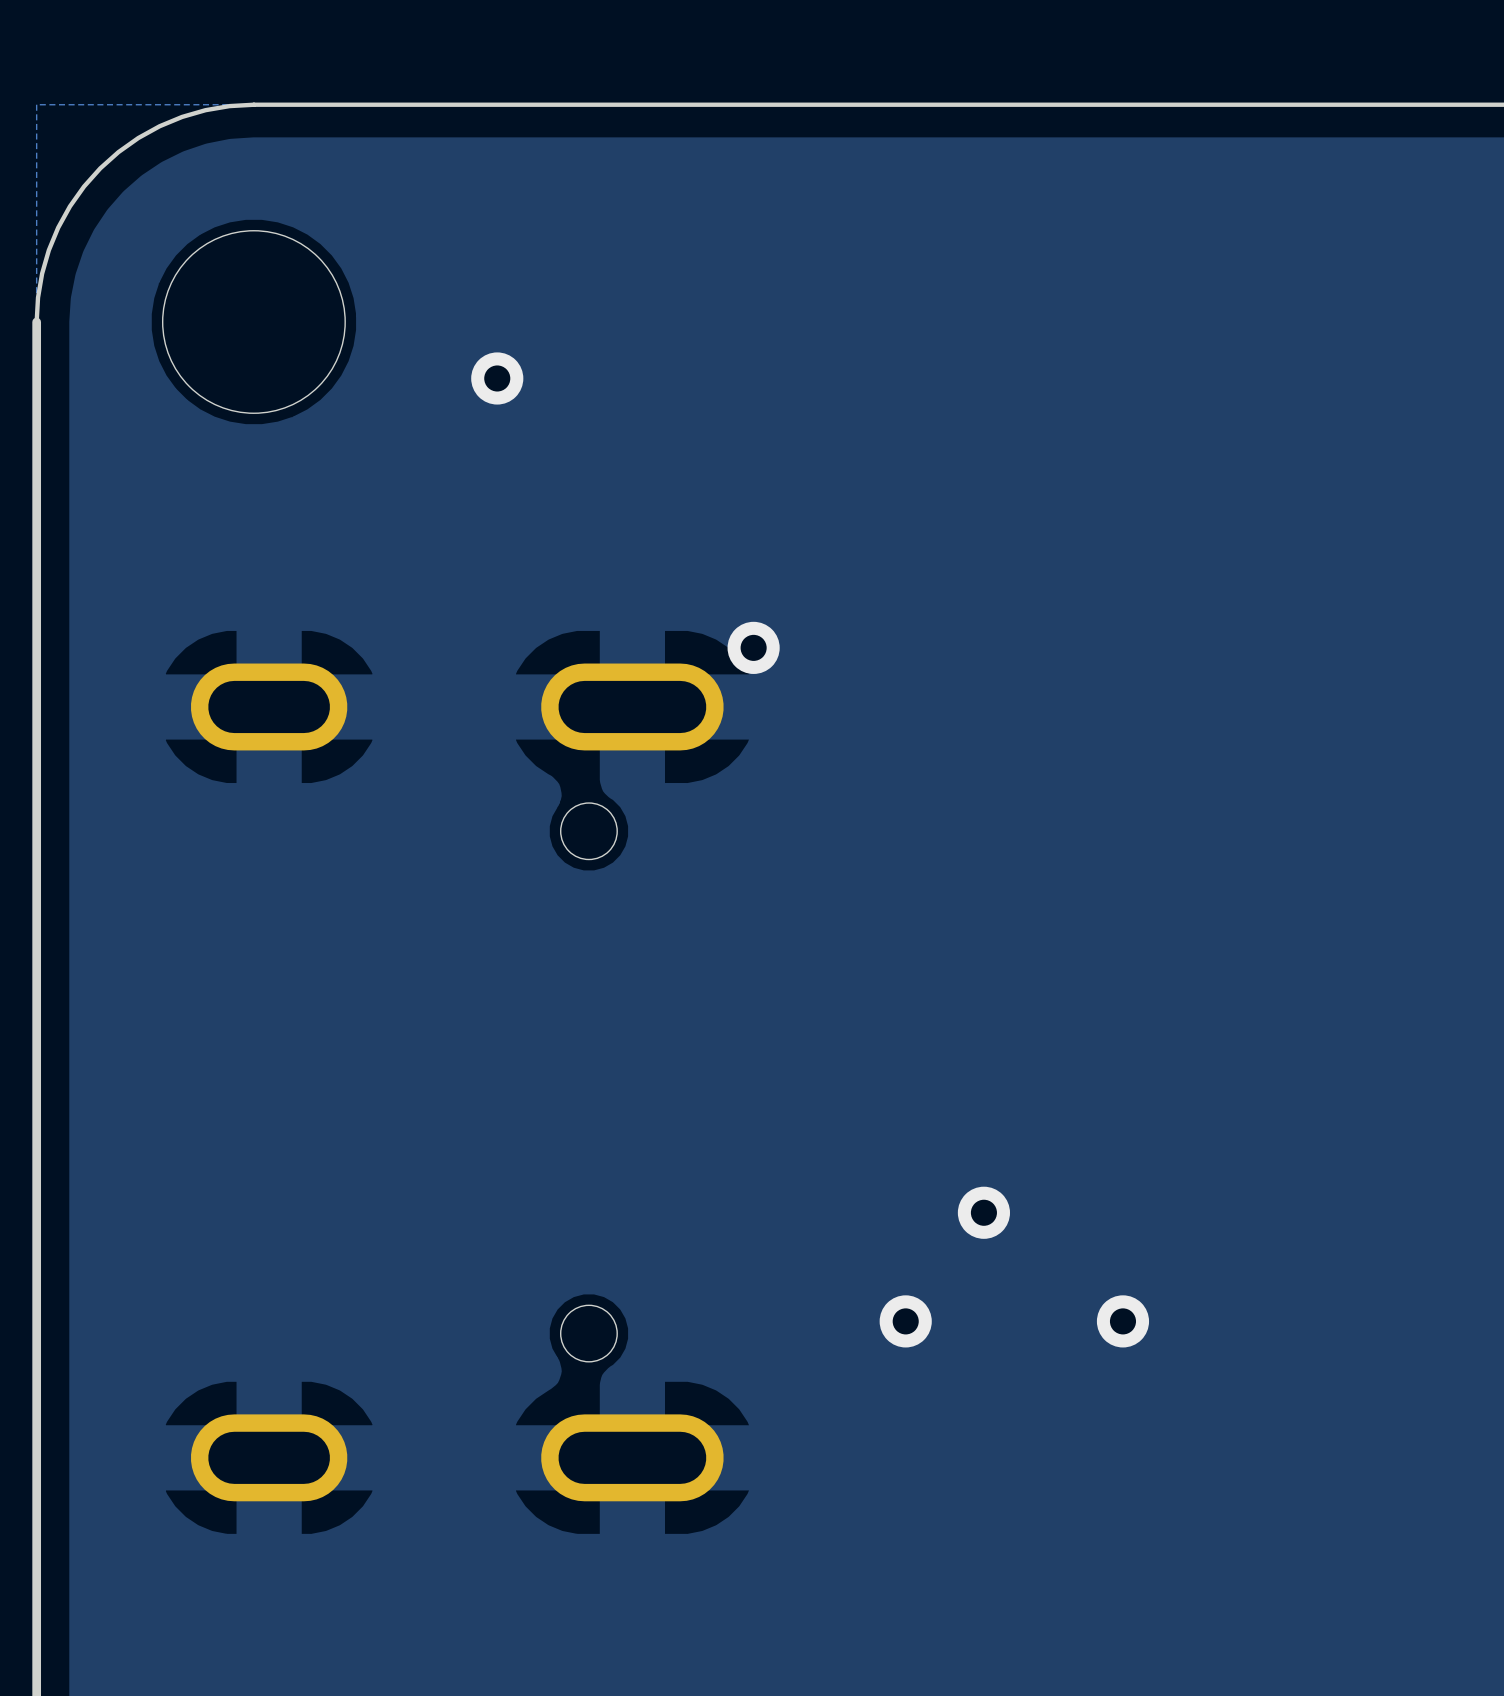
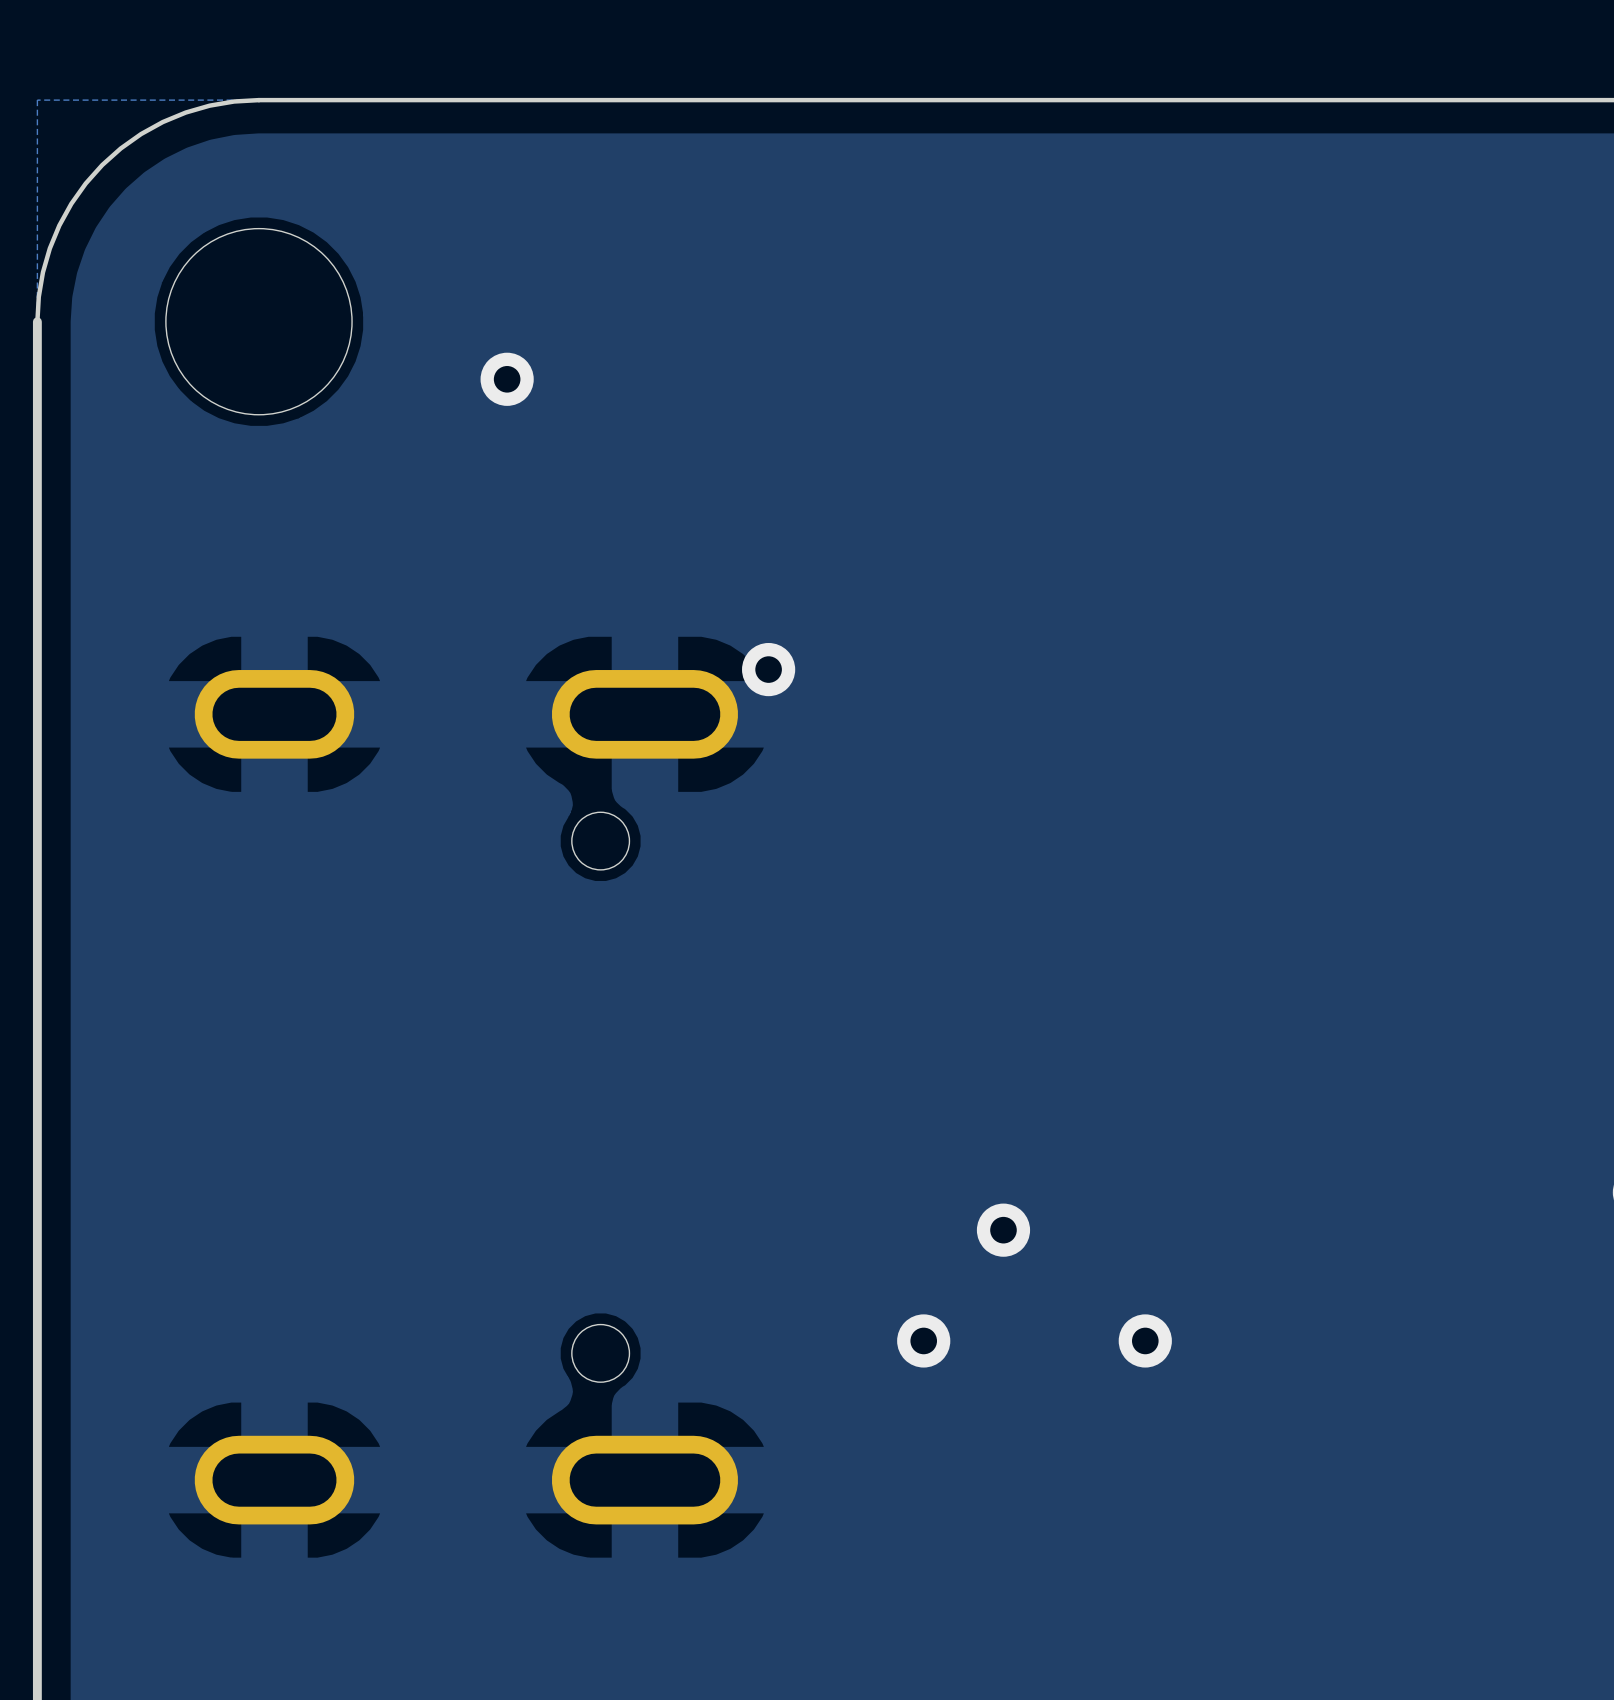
via position: (753, 647) -> (768, 669)

